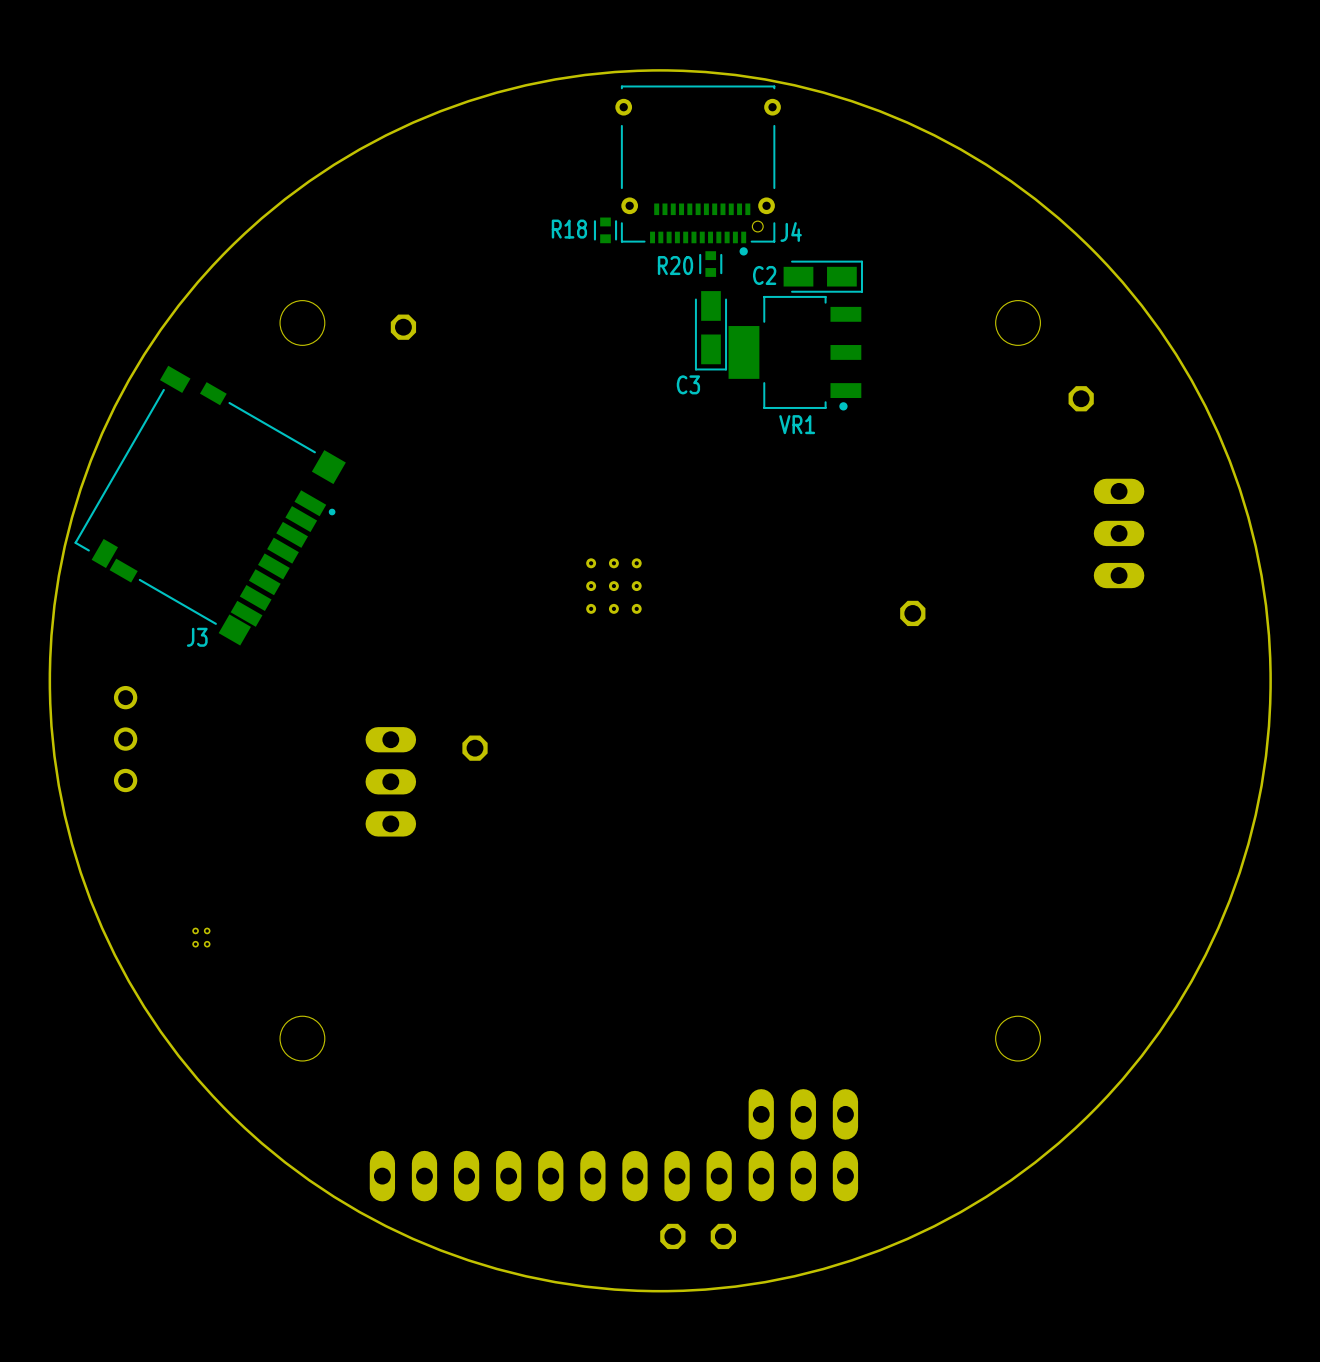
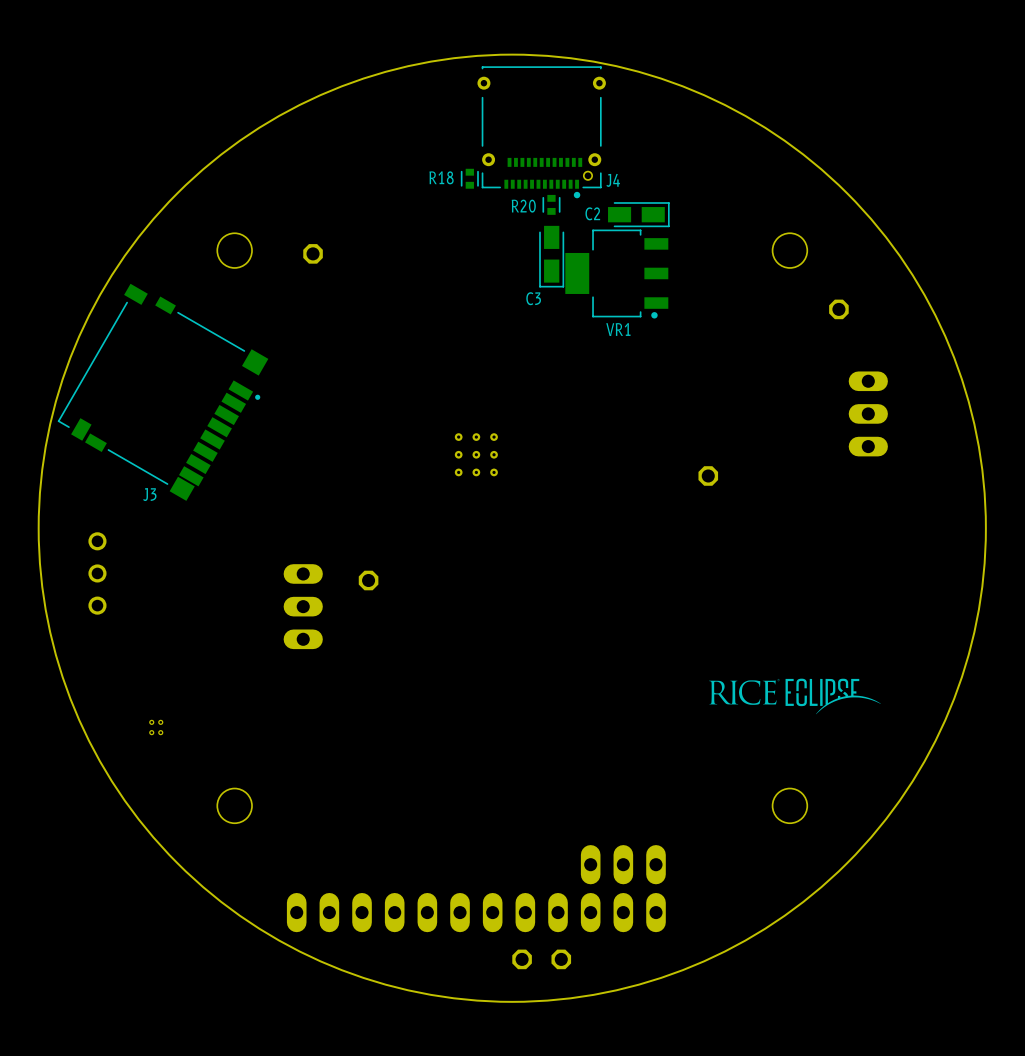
drawing: none -> [709, 678, 882, 715]

